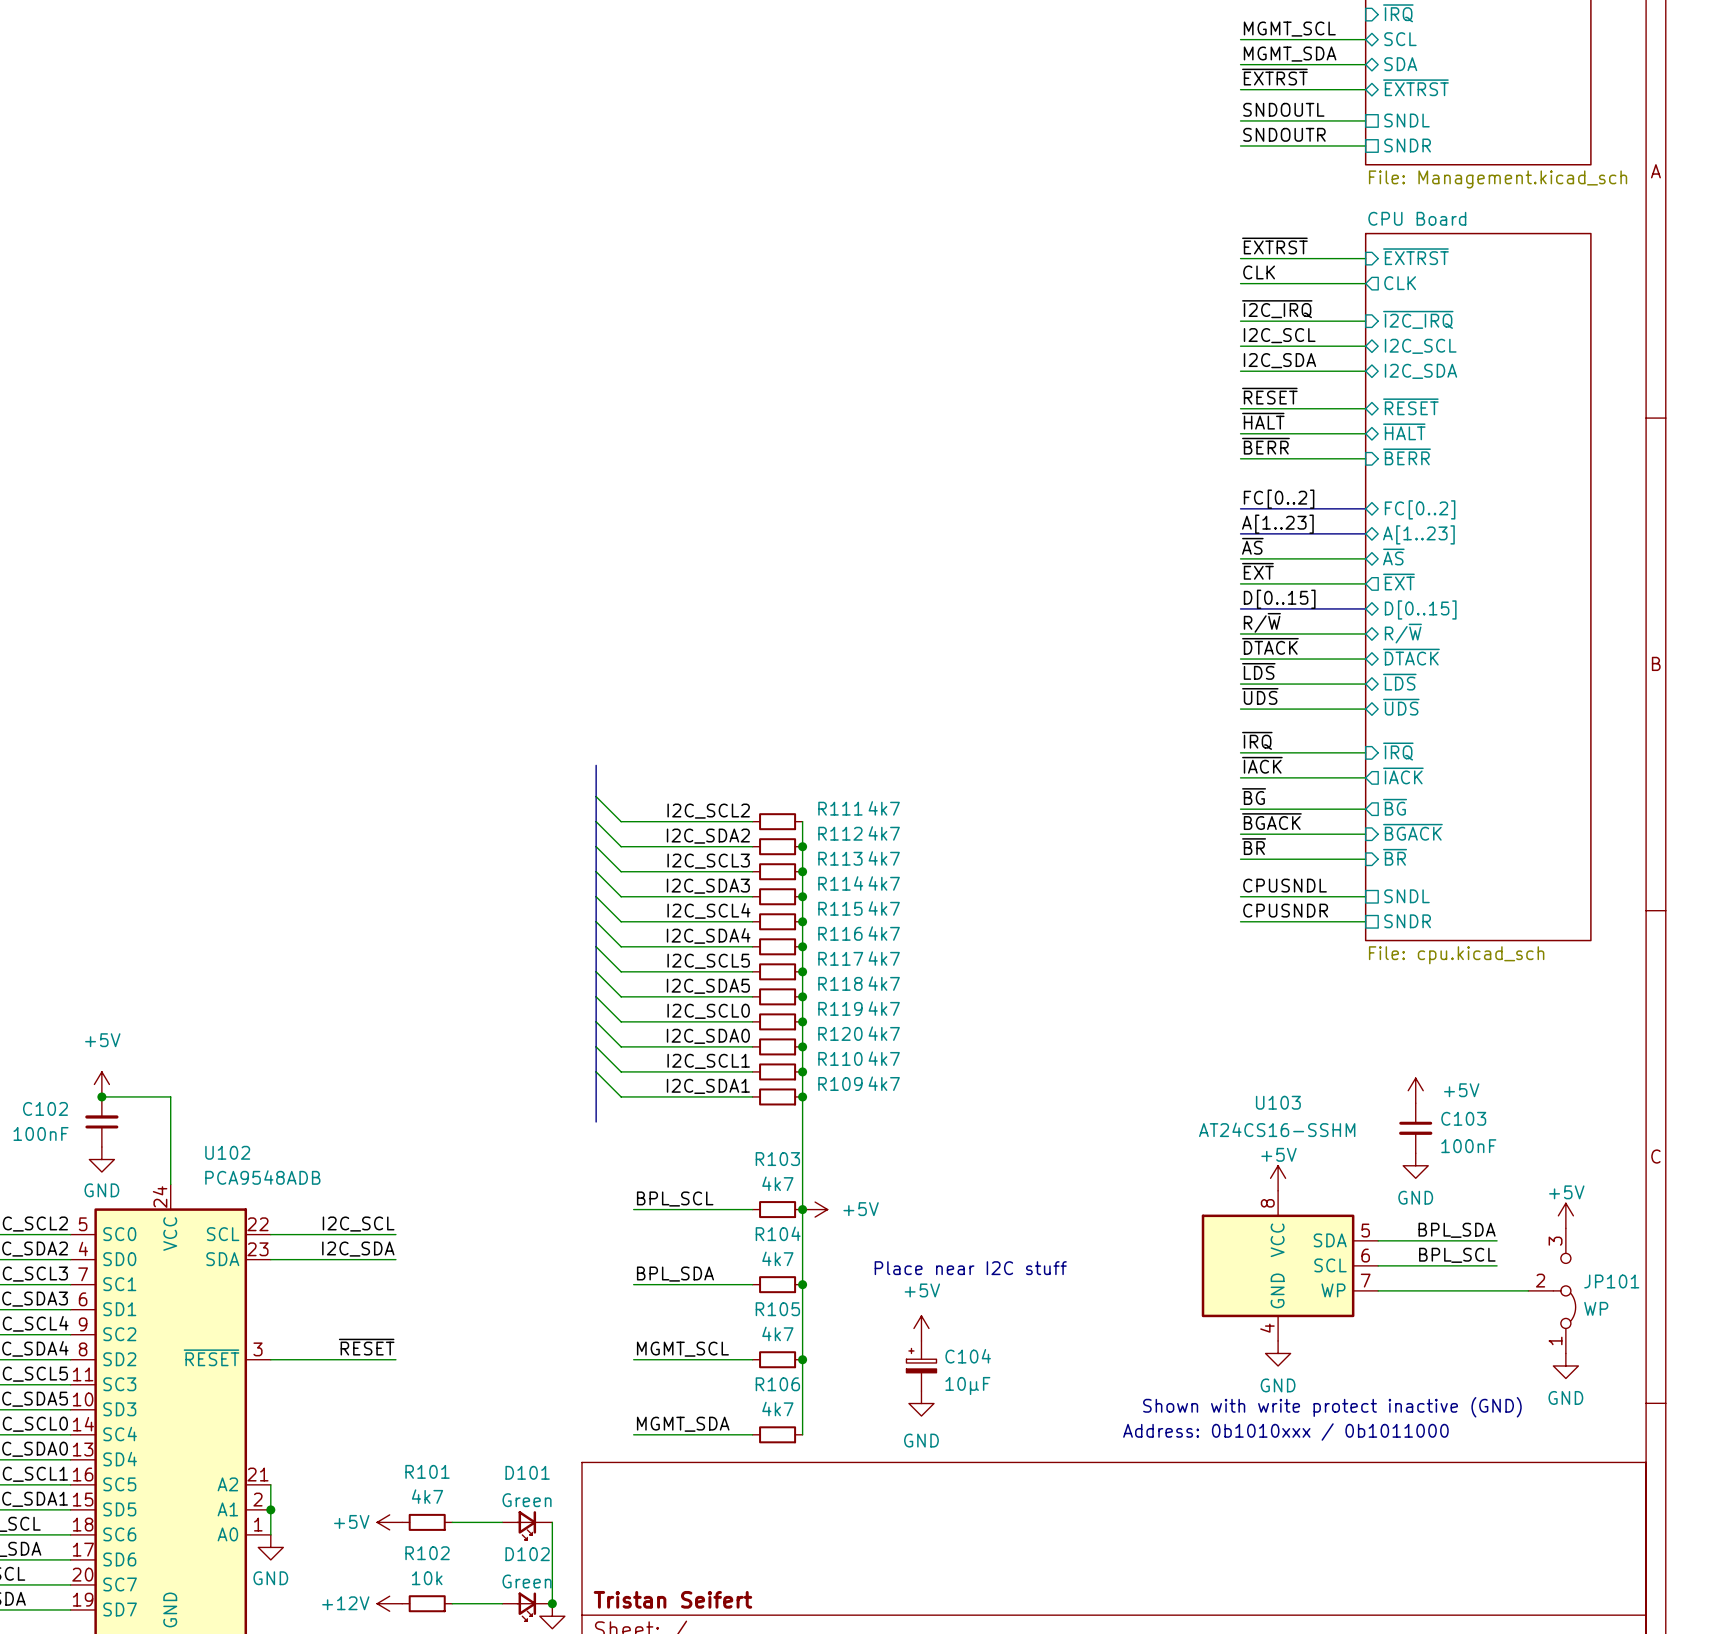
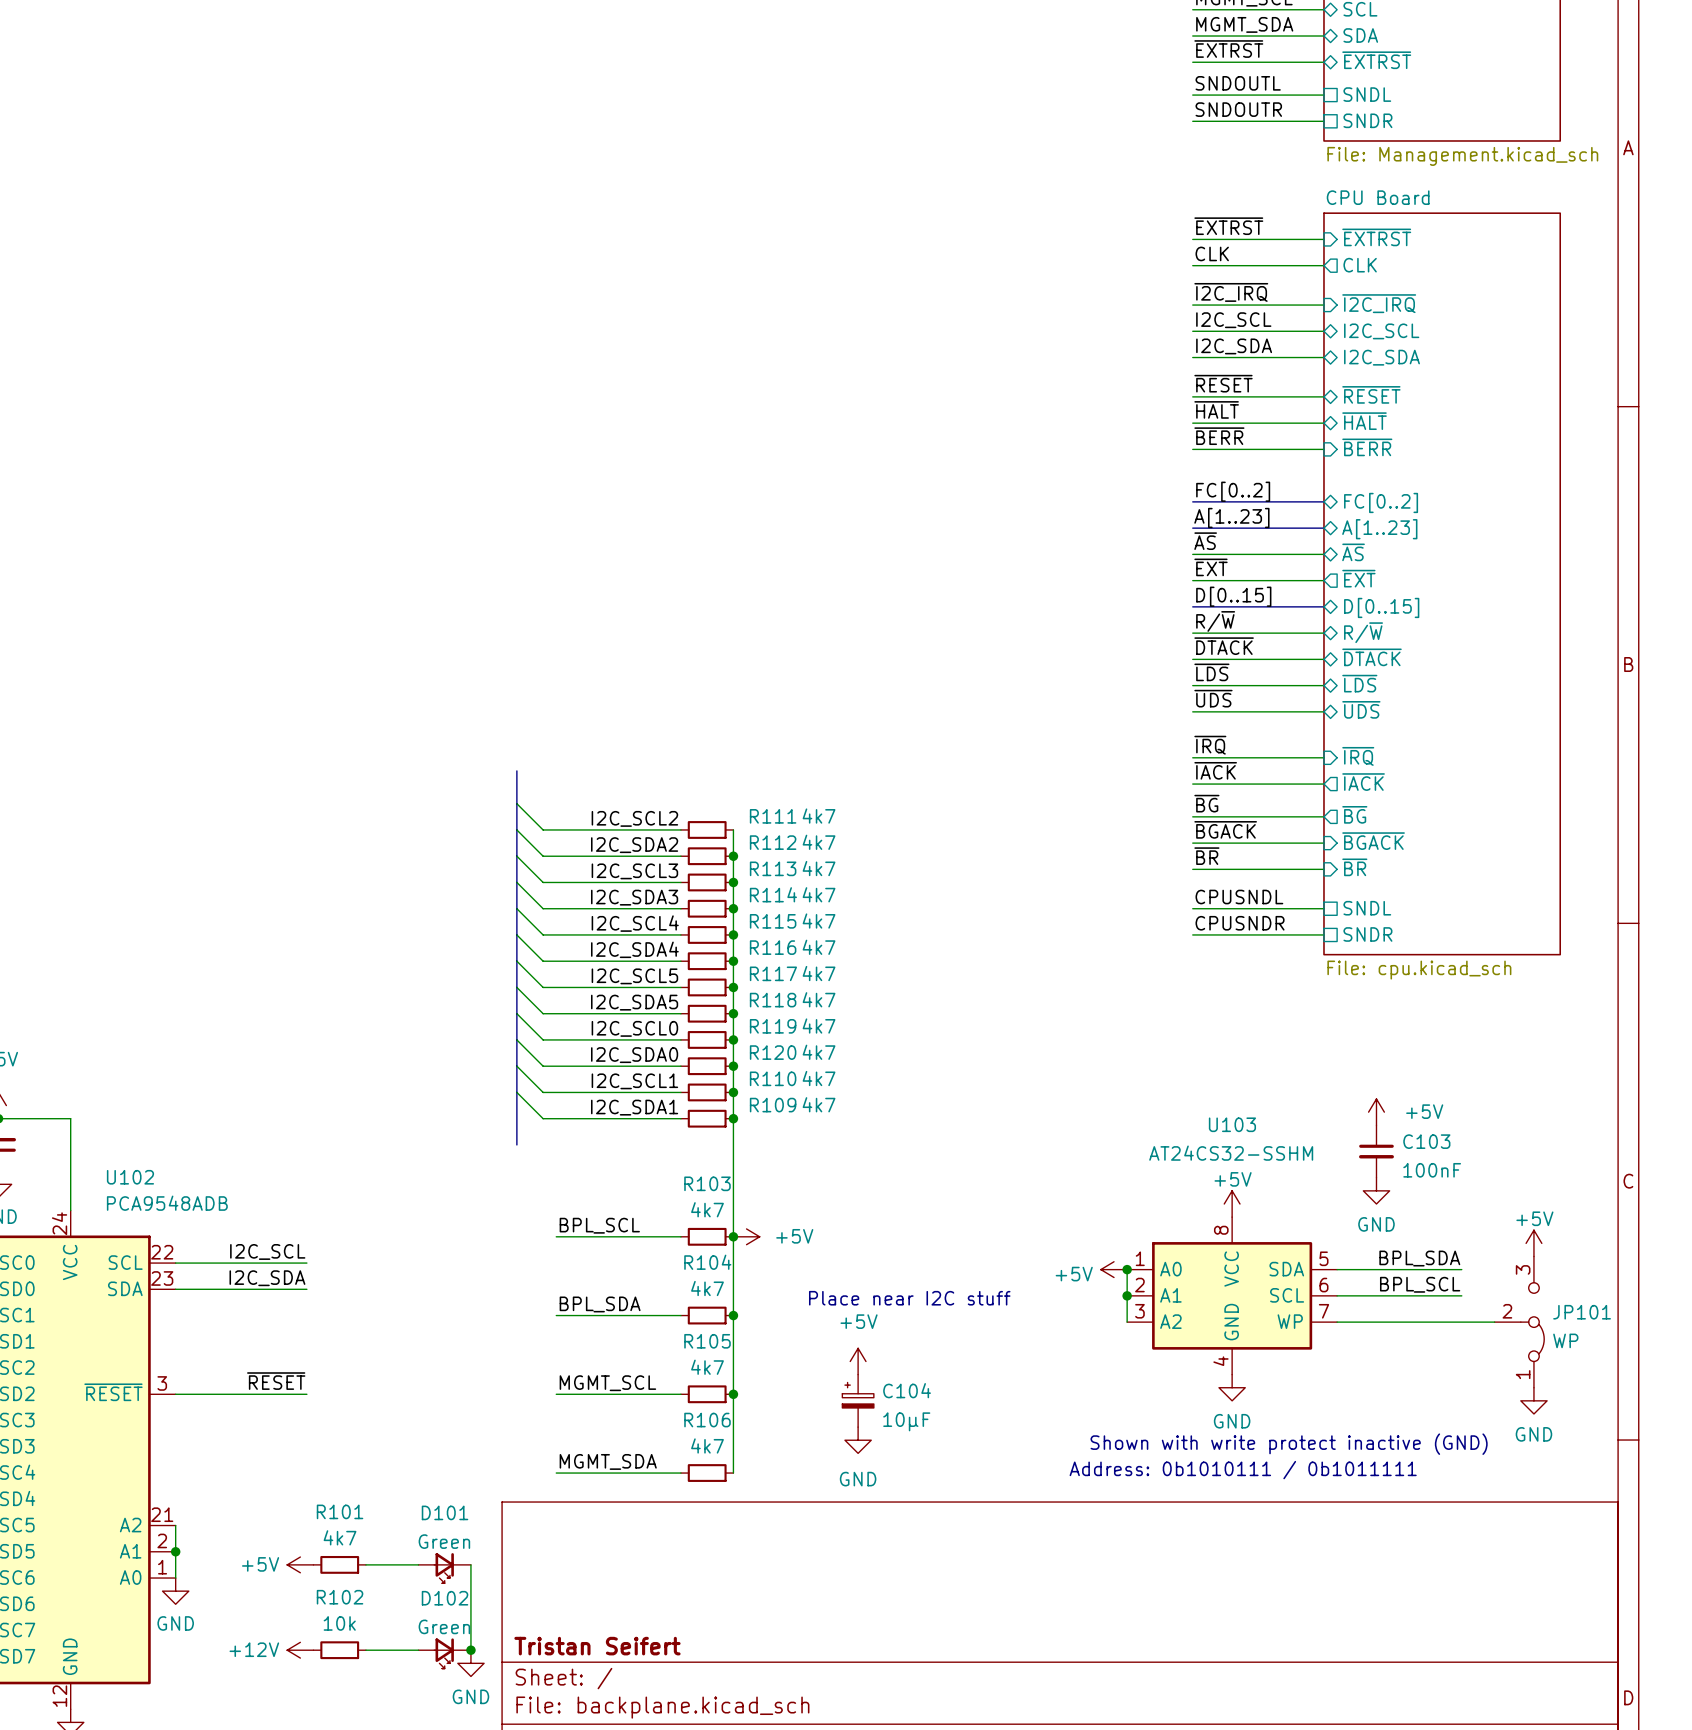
U103 value: AT24CS16-SSHM (1277, 1129) -> AT24CS32-SSHM (1231, 1153)
U103 symbol: [1201, 1190, 1379, 1341] -> [1127, 1217, 1338, 1375]
power symbol: none -> +5V (1114, 1269)
wire: none -> (1127, 1269) (1127, 1322)
junction: none -> (1127, 1269)
junction: none -> (1127, 1295)
text: Address: 0b1010xxx / 0b1011000 (1285, 1432) -> Address: 0b1010111 / 0b1011111 (1243, 1470)

